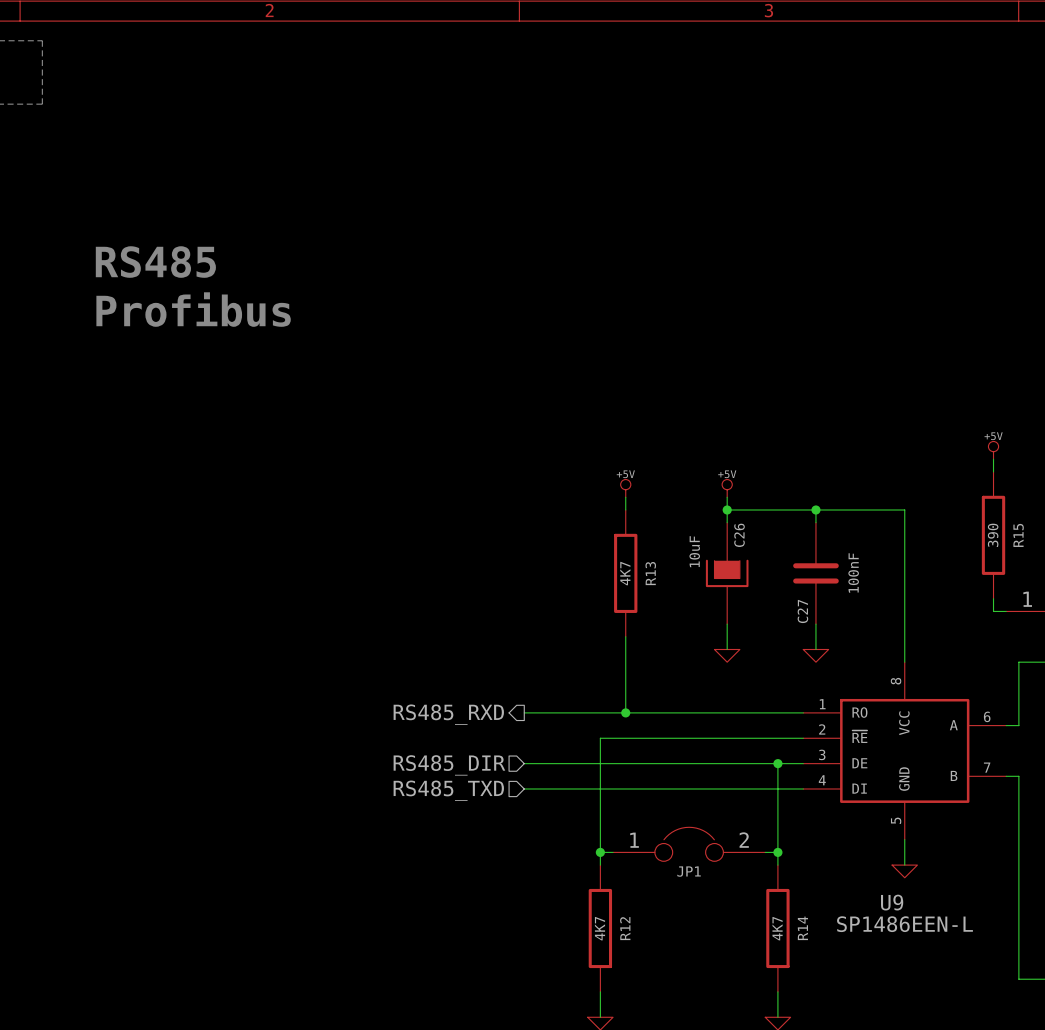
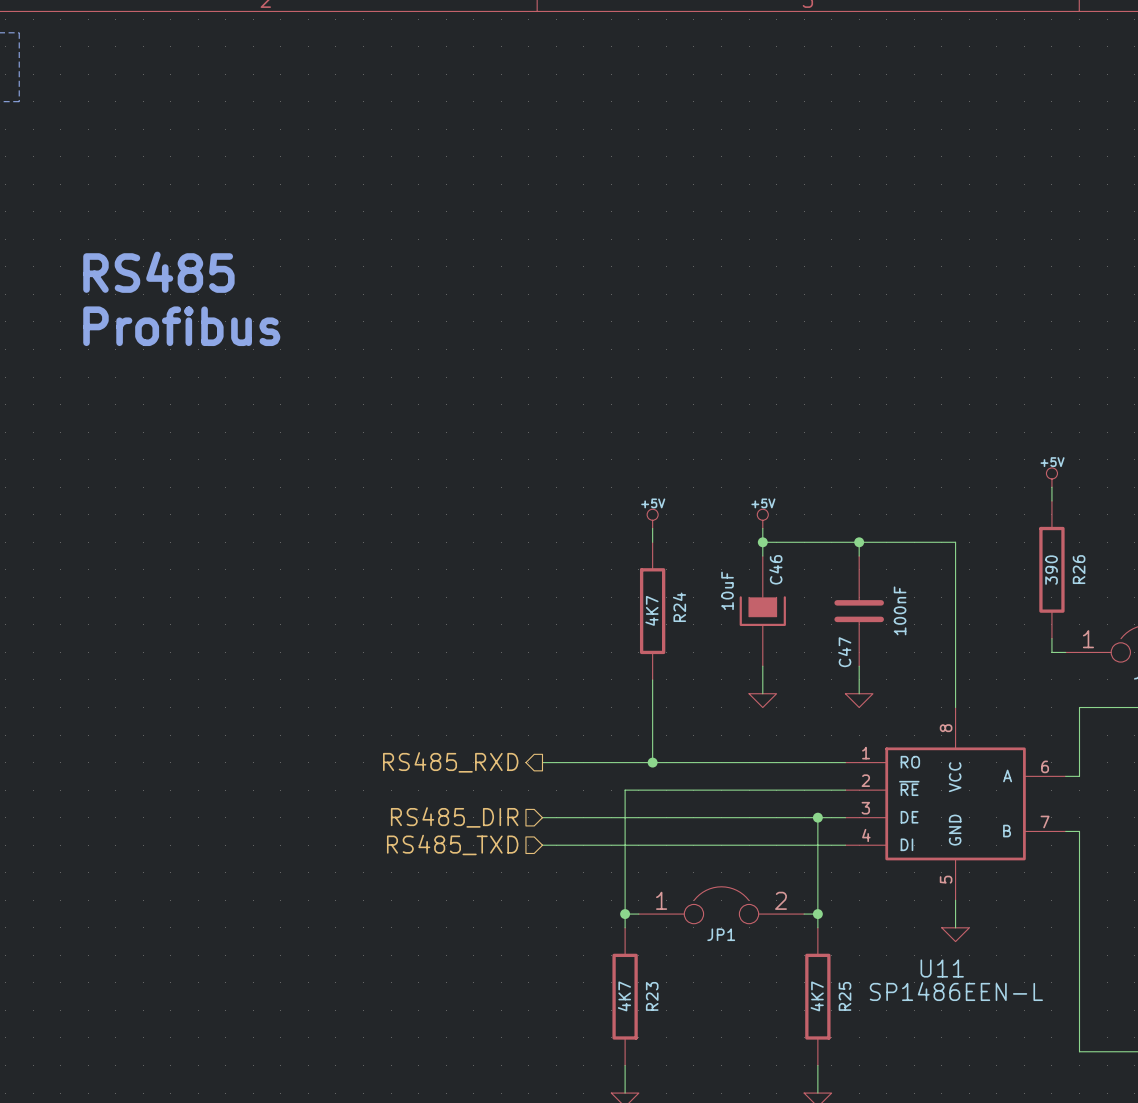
C26 name: C26 (739, 535) -> C46 (775, 569)
R15 name: R15 (1018, 535) -> R26 (1079, 569)
R13 name: R13 (650, 573) -> R24 (679, 607)
C27 name: C27 (802, 611) -> C47 (844, 652)
U9 name: U9 (892, 902) -> U11 (942, 968)
R12 name: R12 (625, 928) -> R23 (652, 996)
R14 name: R14 (802, 928) -> R25 (845, 996)

